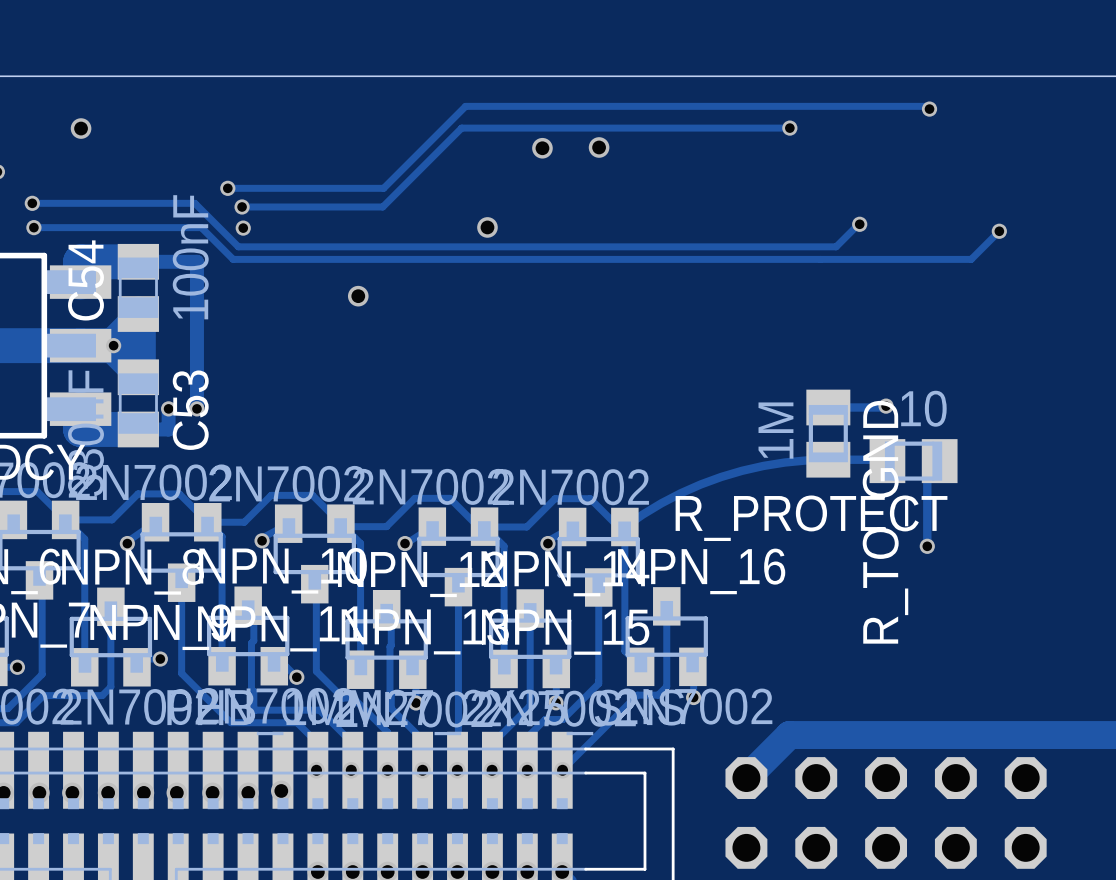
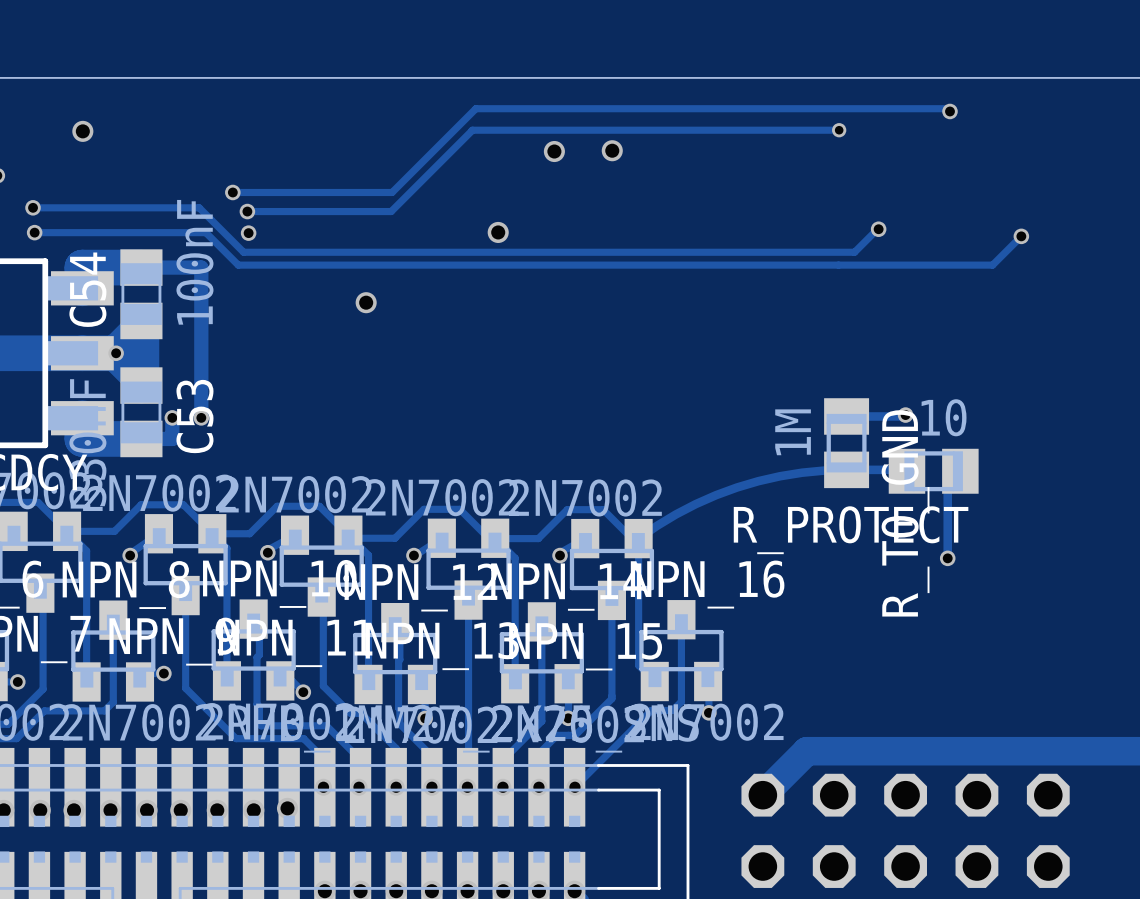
via: none -> (839, 130)
track: (789, 128) (461, 128) -> (839, 130) (471, 130)
via: (789, 128) -> none

